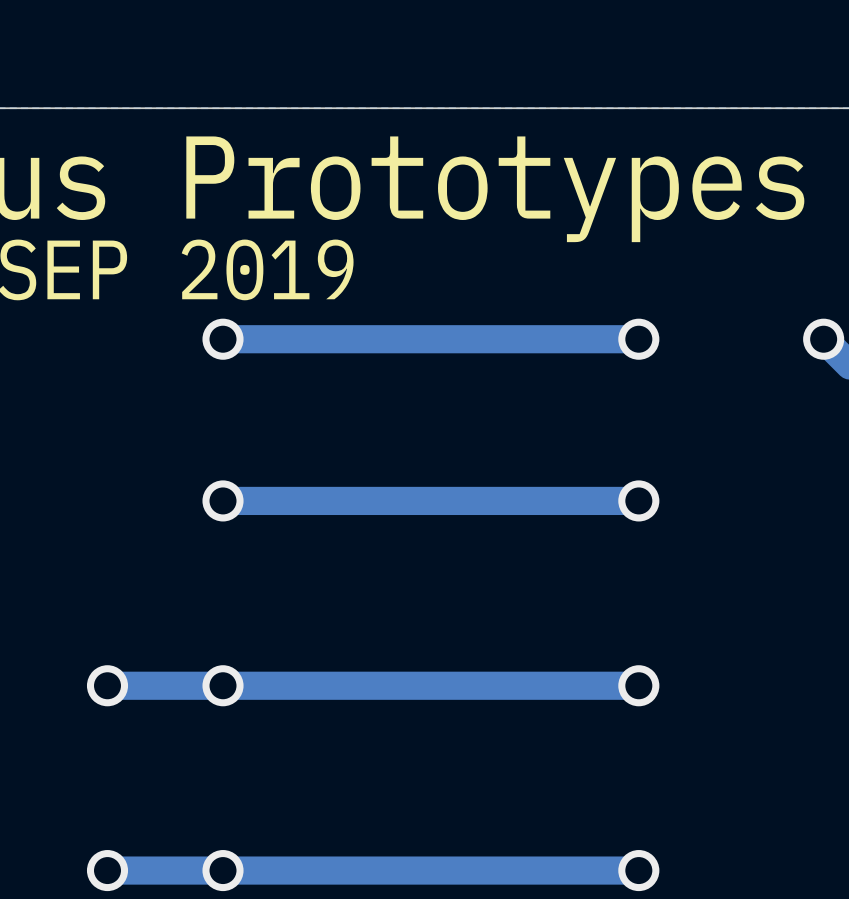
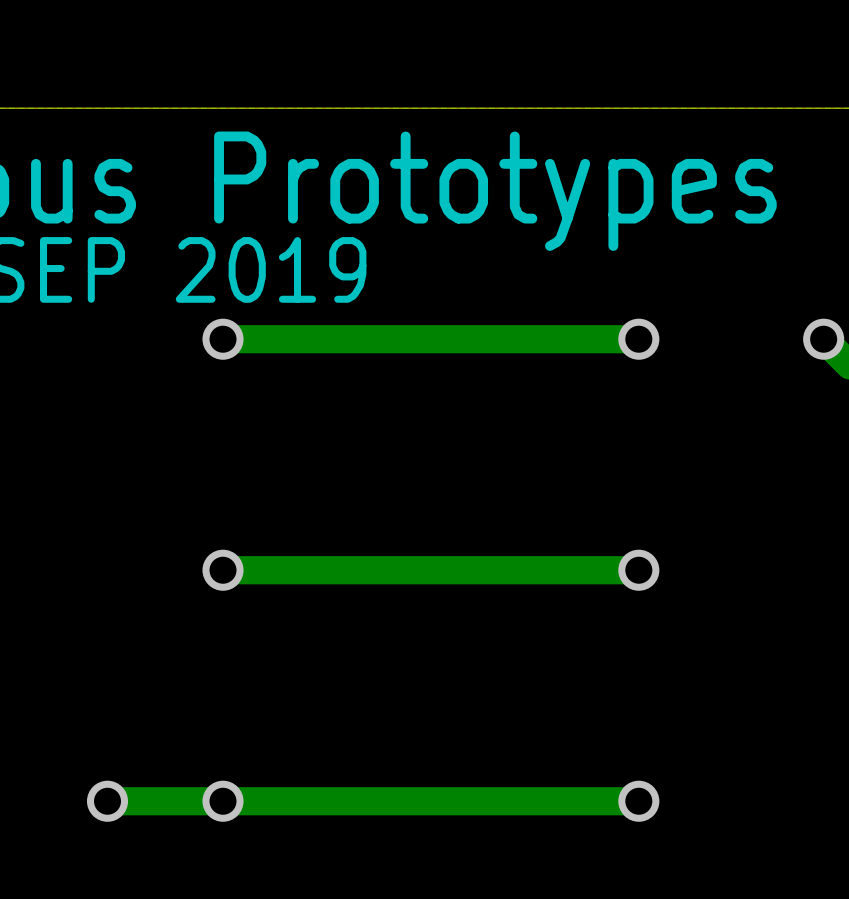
via: (223, 500) -> none
track: (638, 500) (223, 500) -> (638, 570) (223, 570)
via: (638, 500) -> none
via: none -> (223, 570)
via: none -> (638, 570)
via: (107, 685) -> none
via: (223, 685) -> none
track: (638, 685) (107, 685) -> none
via: (638, 685) -> none
via: none -> (107, 801)
via: none -> (223, 801)
via: none -> (638, 801)
via: (107, 870) -> none
via: (223, 870) -> none
track: (638, 870) (107, 870) -> (638, 801) (107, 801)
via: (638, 870) -> none

